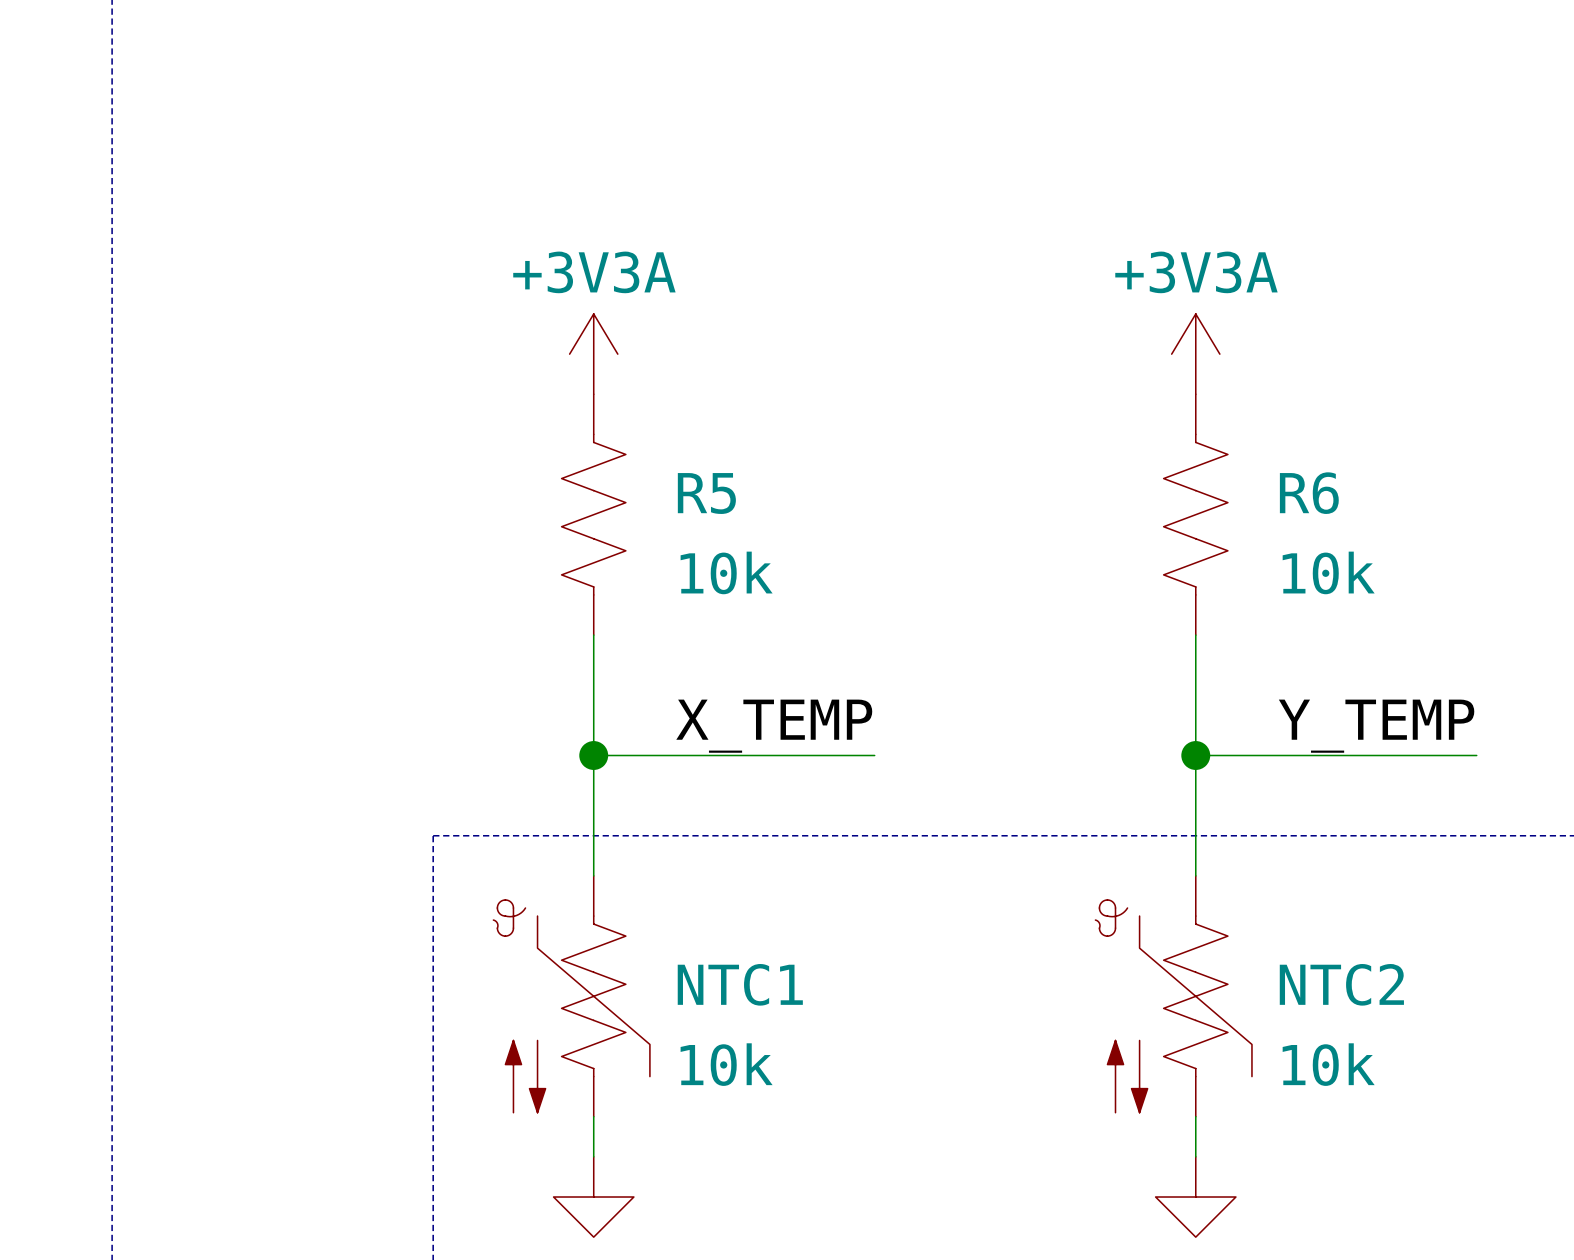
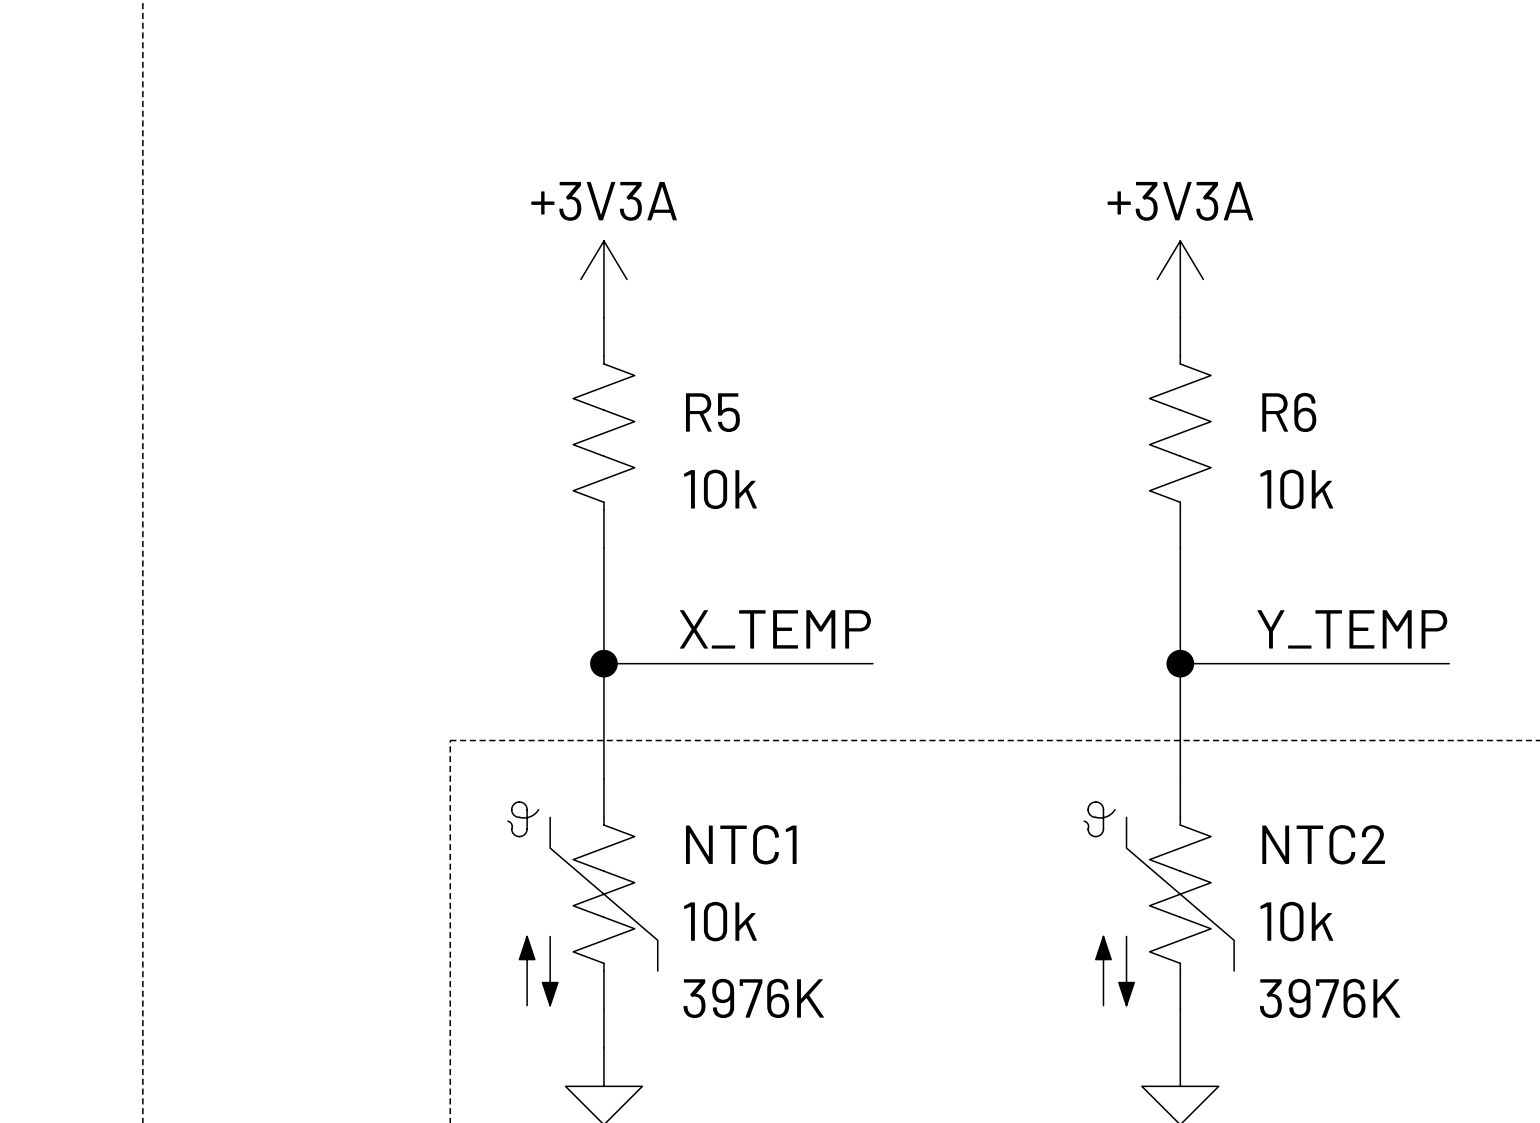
NTC1 name position: NTC1 (740, 984) -> NTC1 (741, 844)
NTC2 name position: NTC2 (1341, 984) -> NTC2 (1323, 844)
NTC1 value position: 10k (726, 1064) -> 10k (720, 921)
NTC2 value position: 10k (1328, 1064) -> 10k (1296, 921)
NTC1 text: none -> 3976K (753, 998)
NTC2 text: none -> 3976K (1330, 998)

